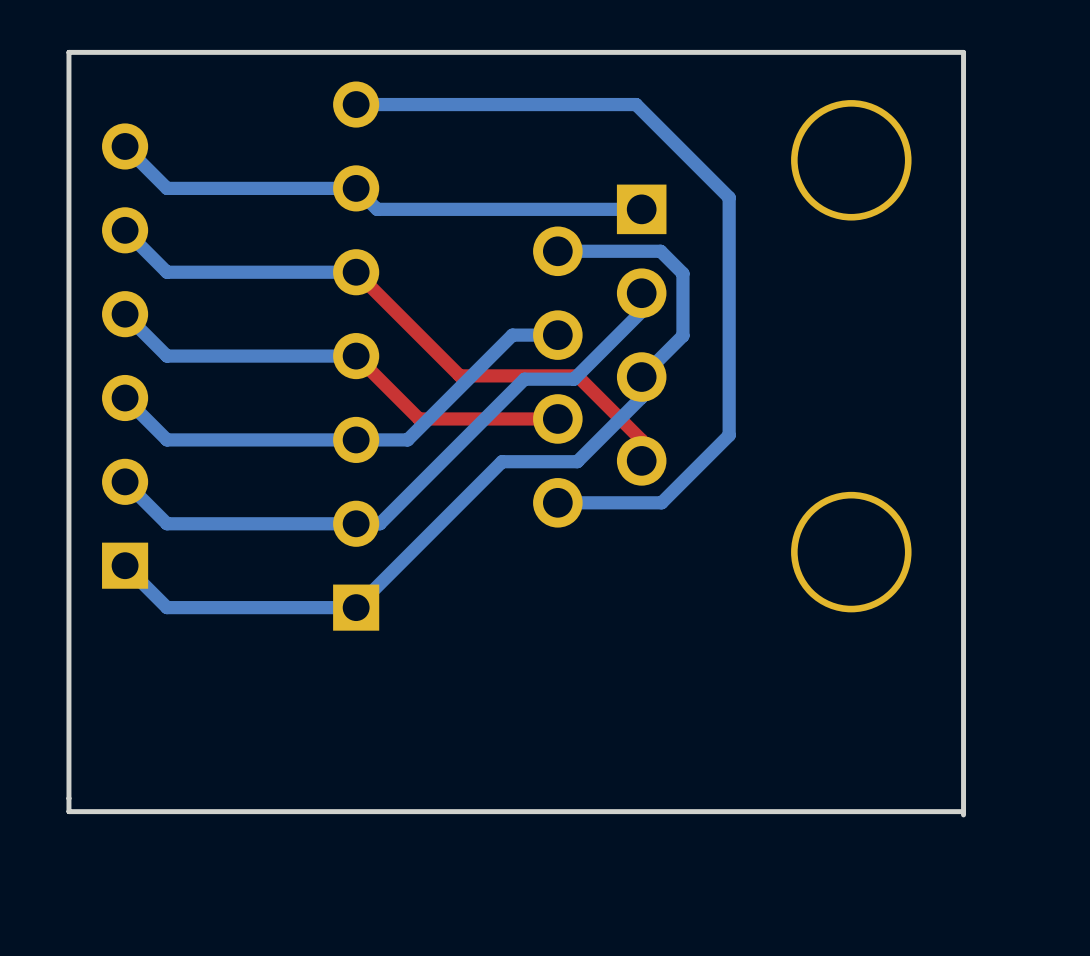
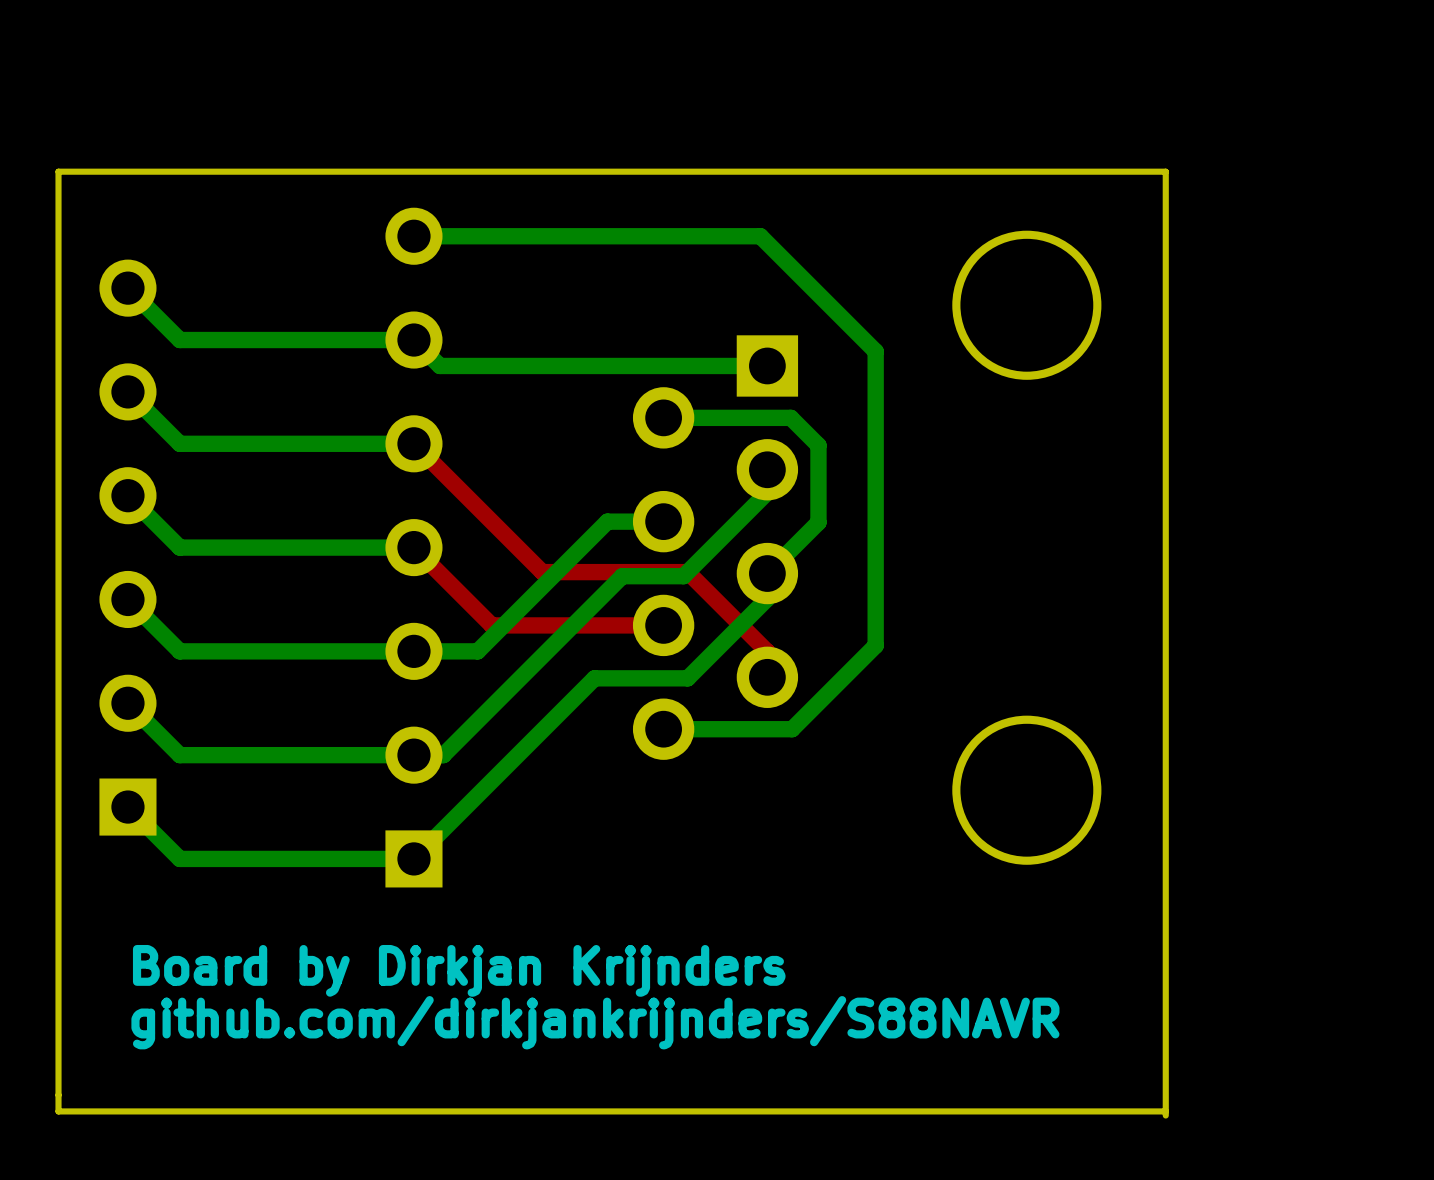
text: none -> Board by Dirkjan Krijnders (459, 970)
text: none -> github.com/dirkjankrijnders/S88NAVR (595, 1022)

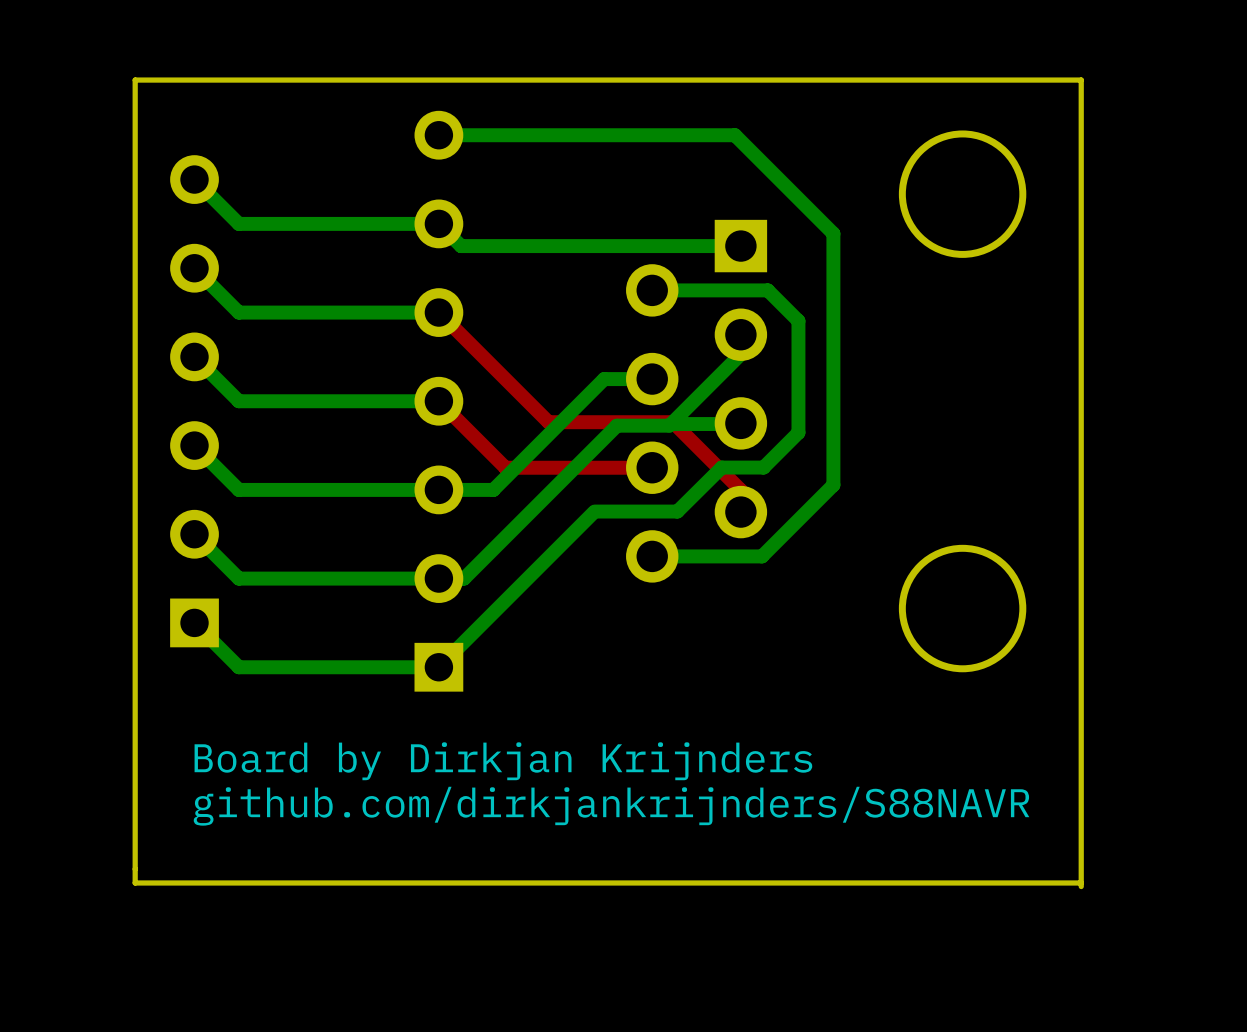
bottom track: (663, 417) (790, 417) (818, 445) (818, 522) (767, 573) -> (652, 290) (767, 290) (798, 320) (798, 432) (763, 467) (721, 467) (677, 511) (594, 511)
bottom track: (767, 573) (767, 598) (687, 678) (594, 678) -> (740, 423) (671, 424)

